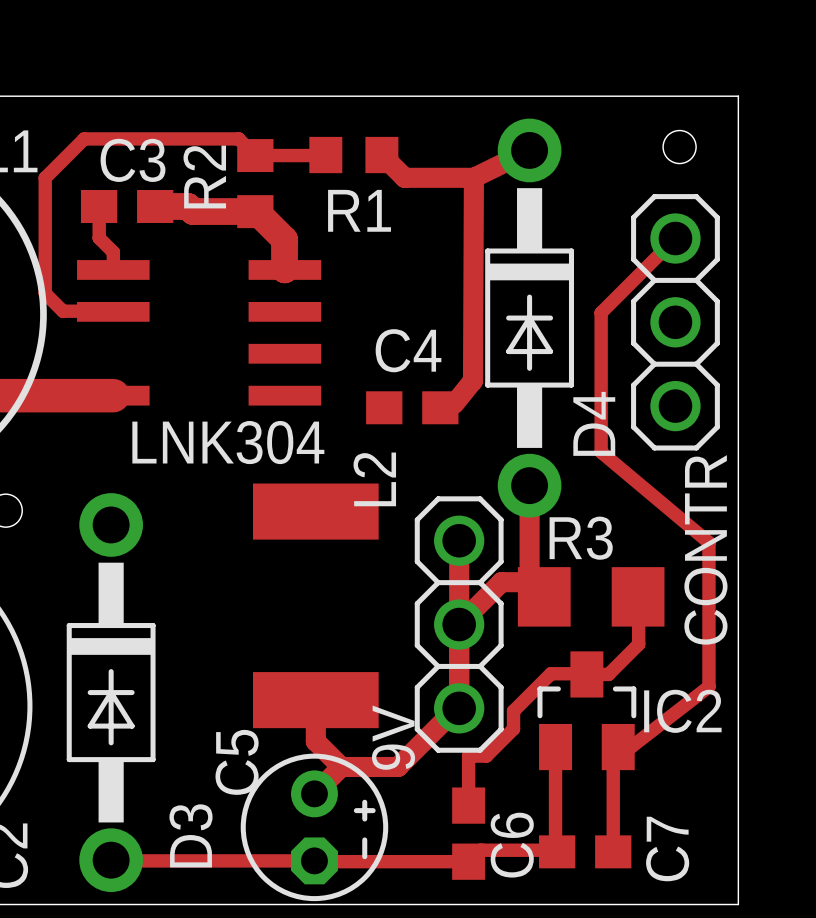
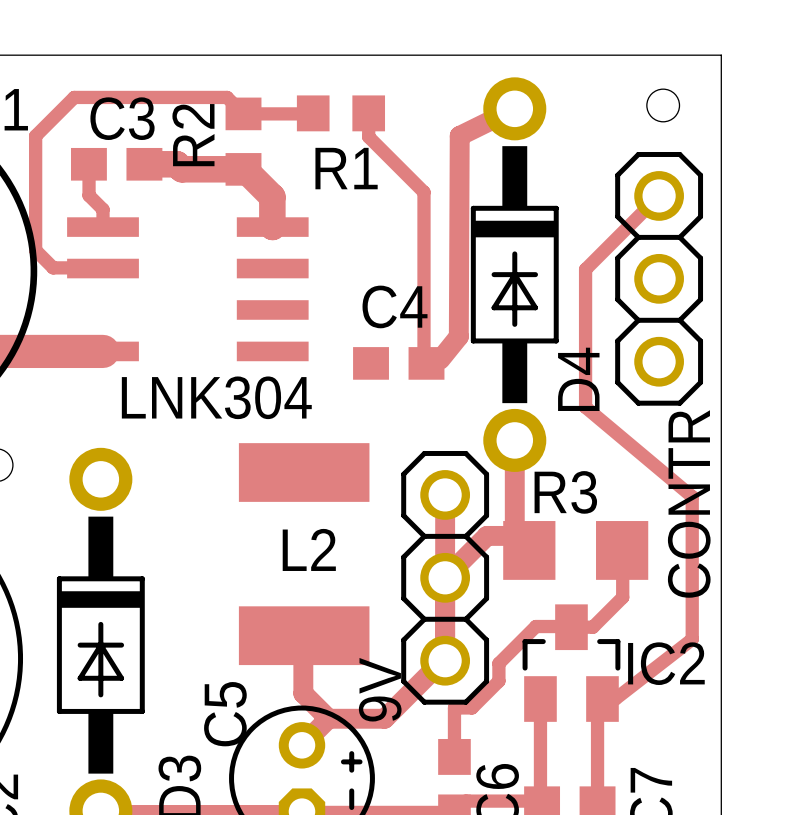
track: (381, 155) (404, 177) (473, 177) -> (368, 113) (368, 136) (423, 192) (423, 360) (426, 363)
L2 name rotation: 0° (374, 479) -> 90° clockwise (309, 549)
L2 name position: L2 (374, 479) -> L2 (309, 549)
L2 footprint: [252, 483, 379, 729] -> [238, 443, 370, 666]

